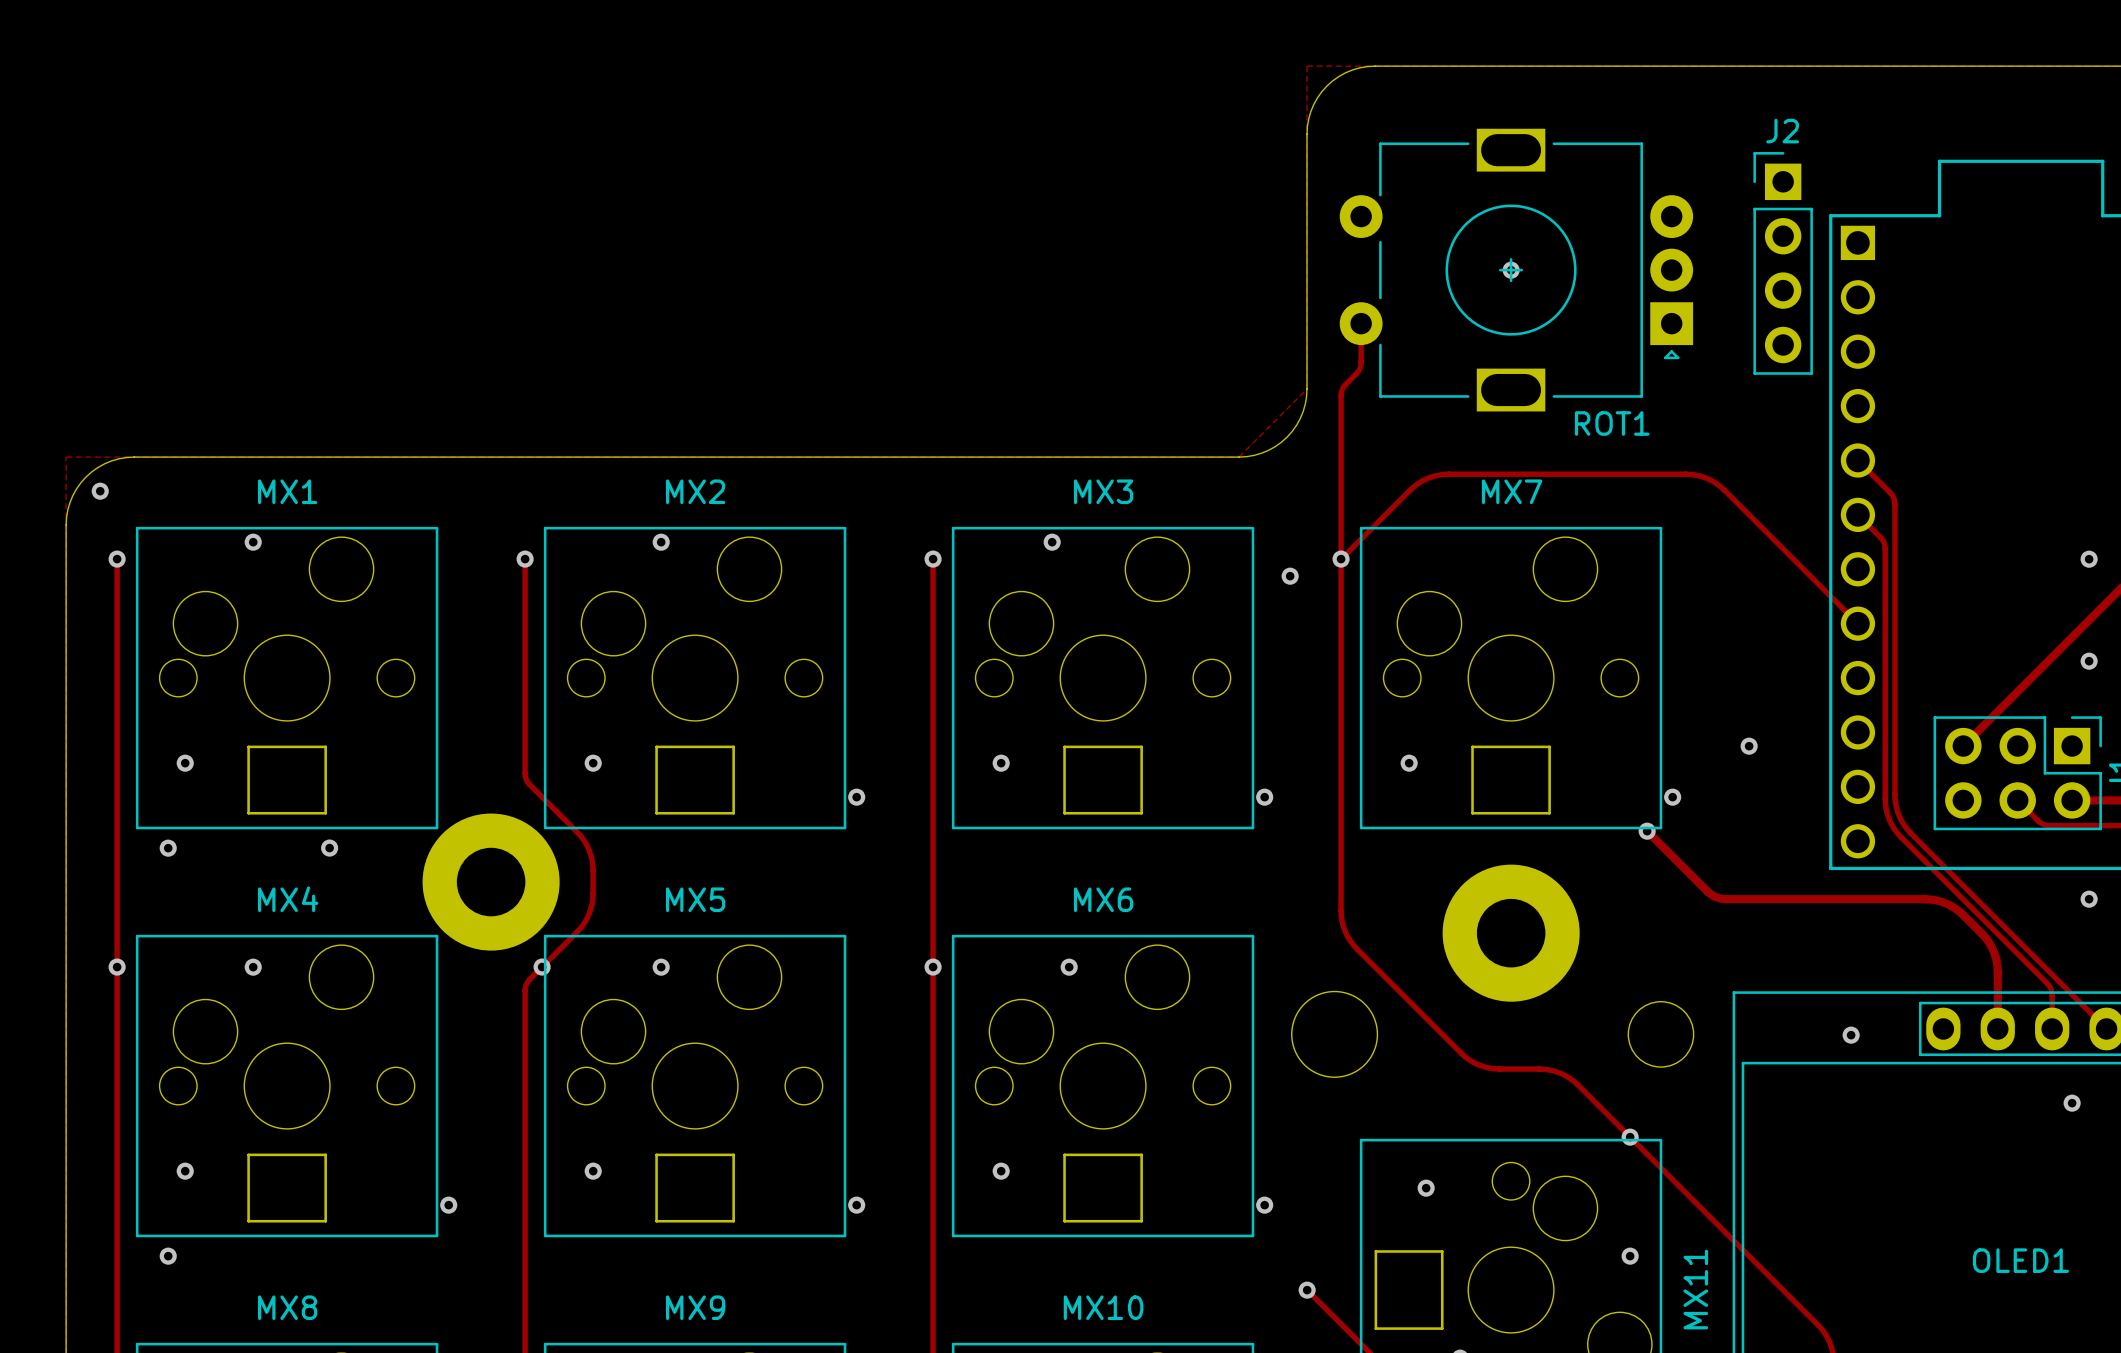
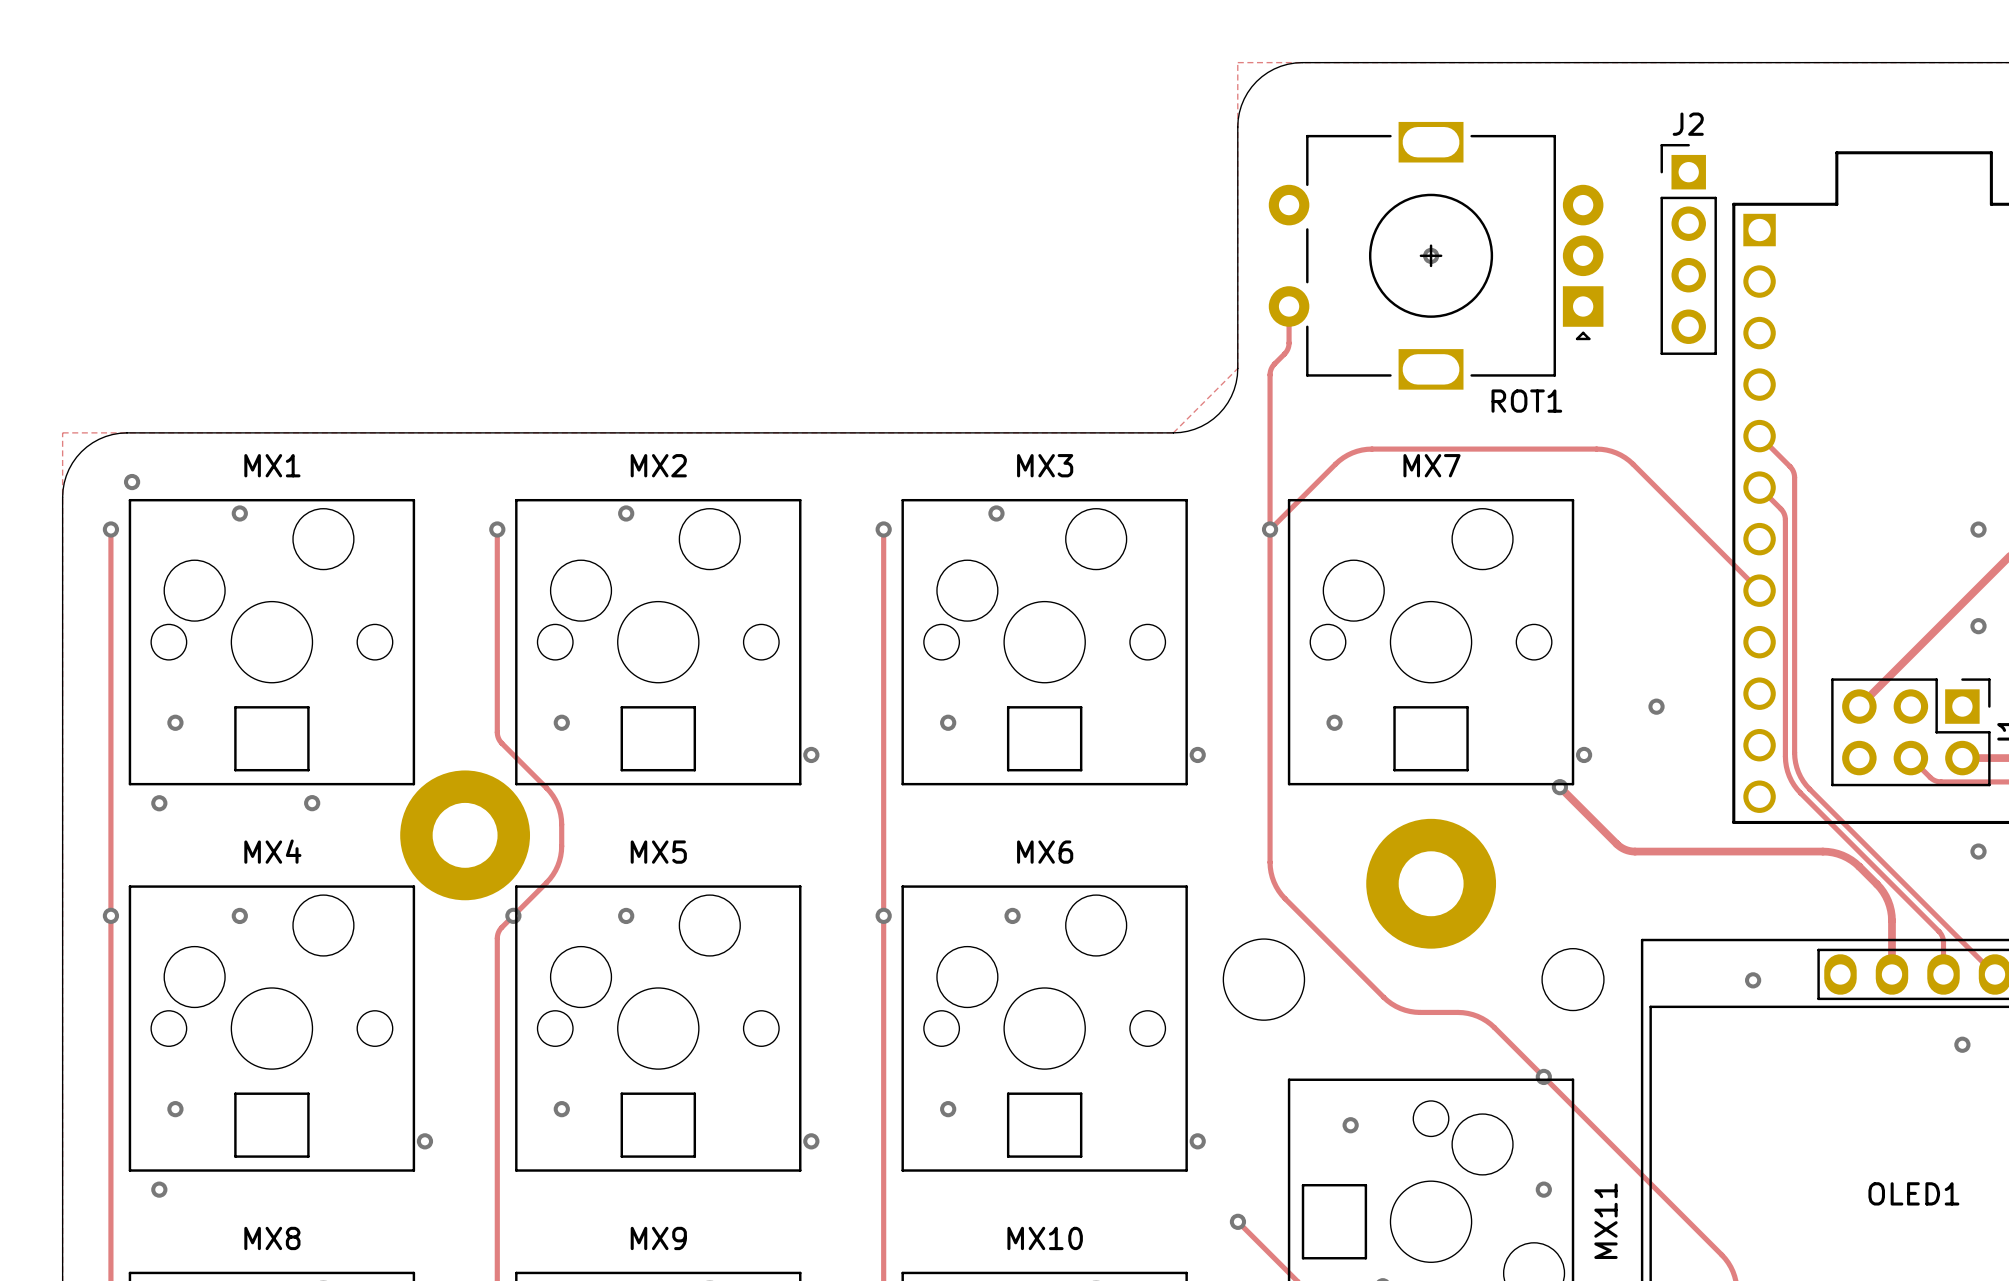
via position: (100, 491) -> (132, 482)
via: (1290, 576) -> none

